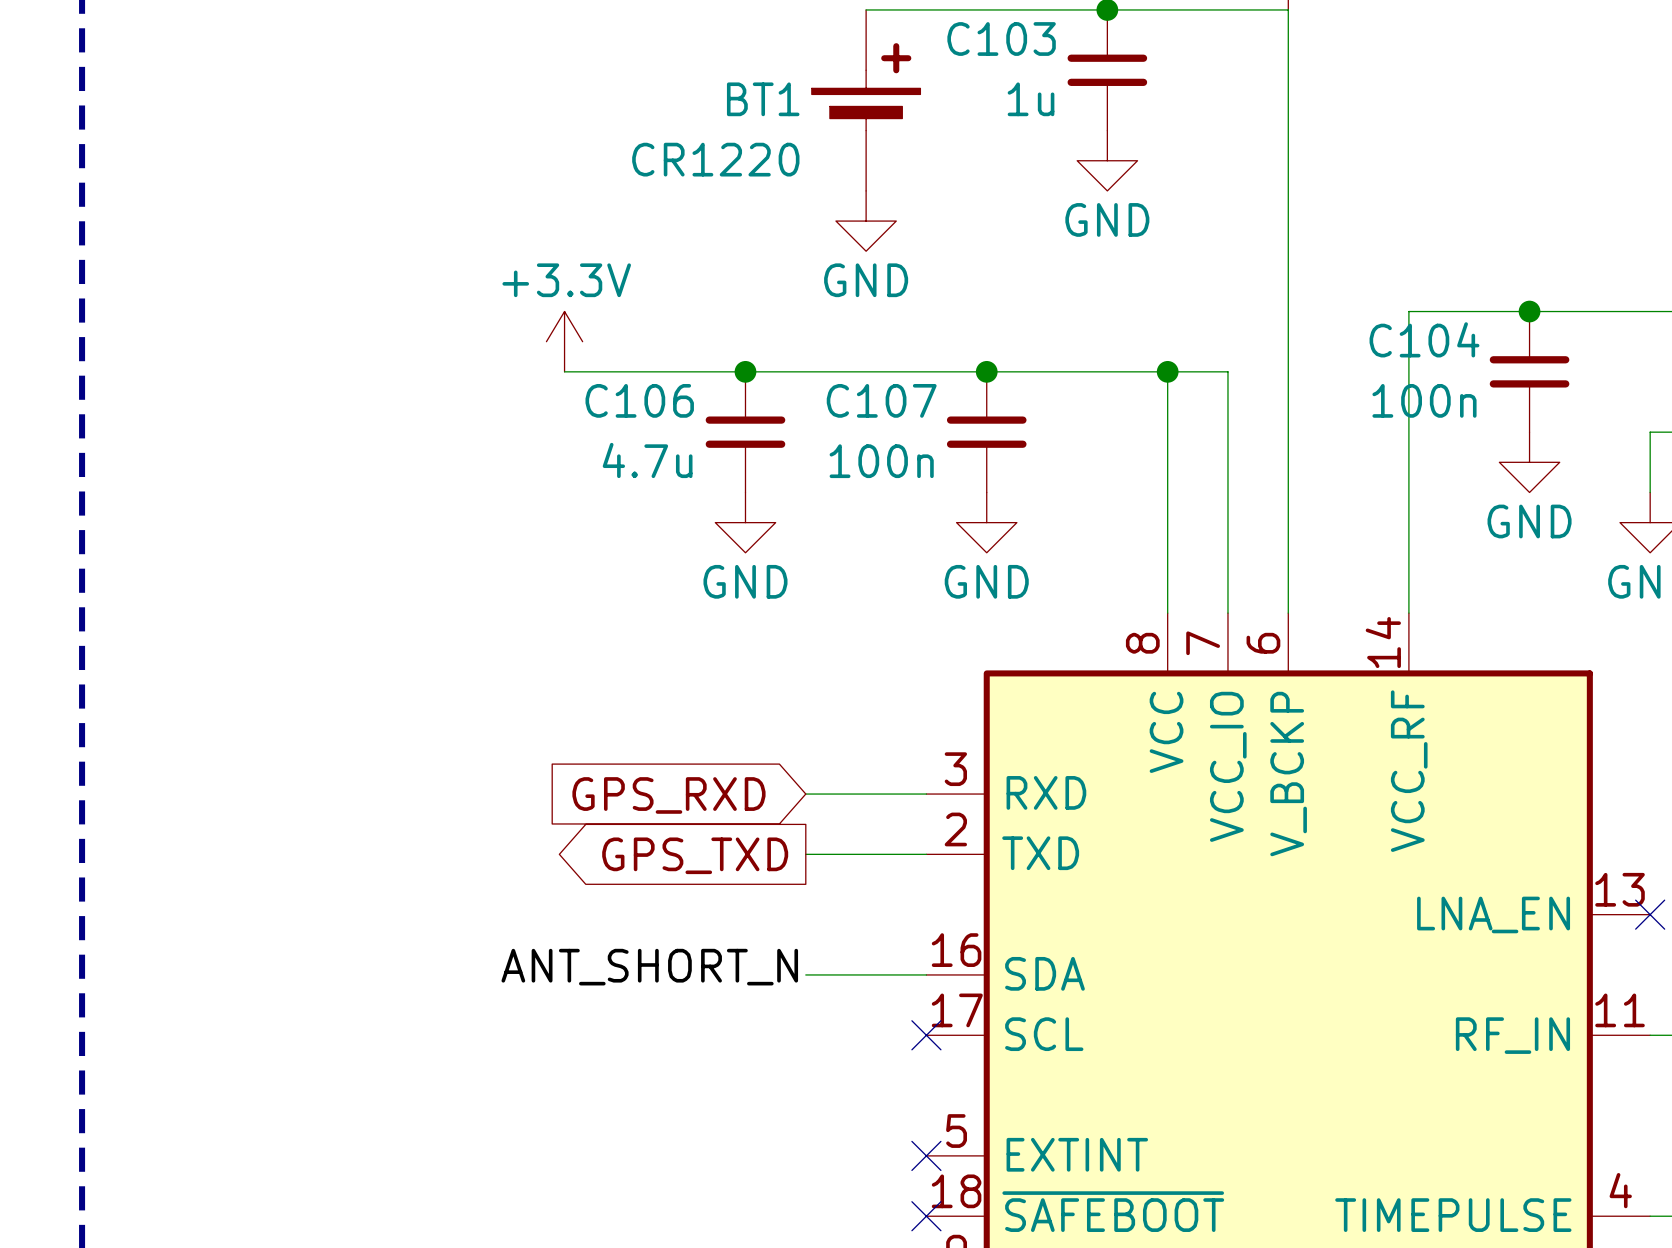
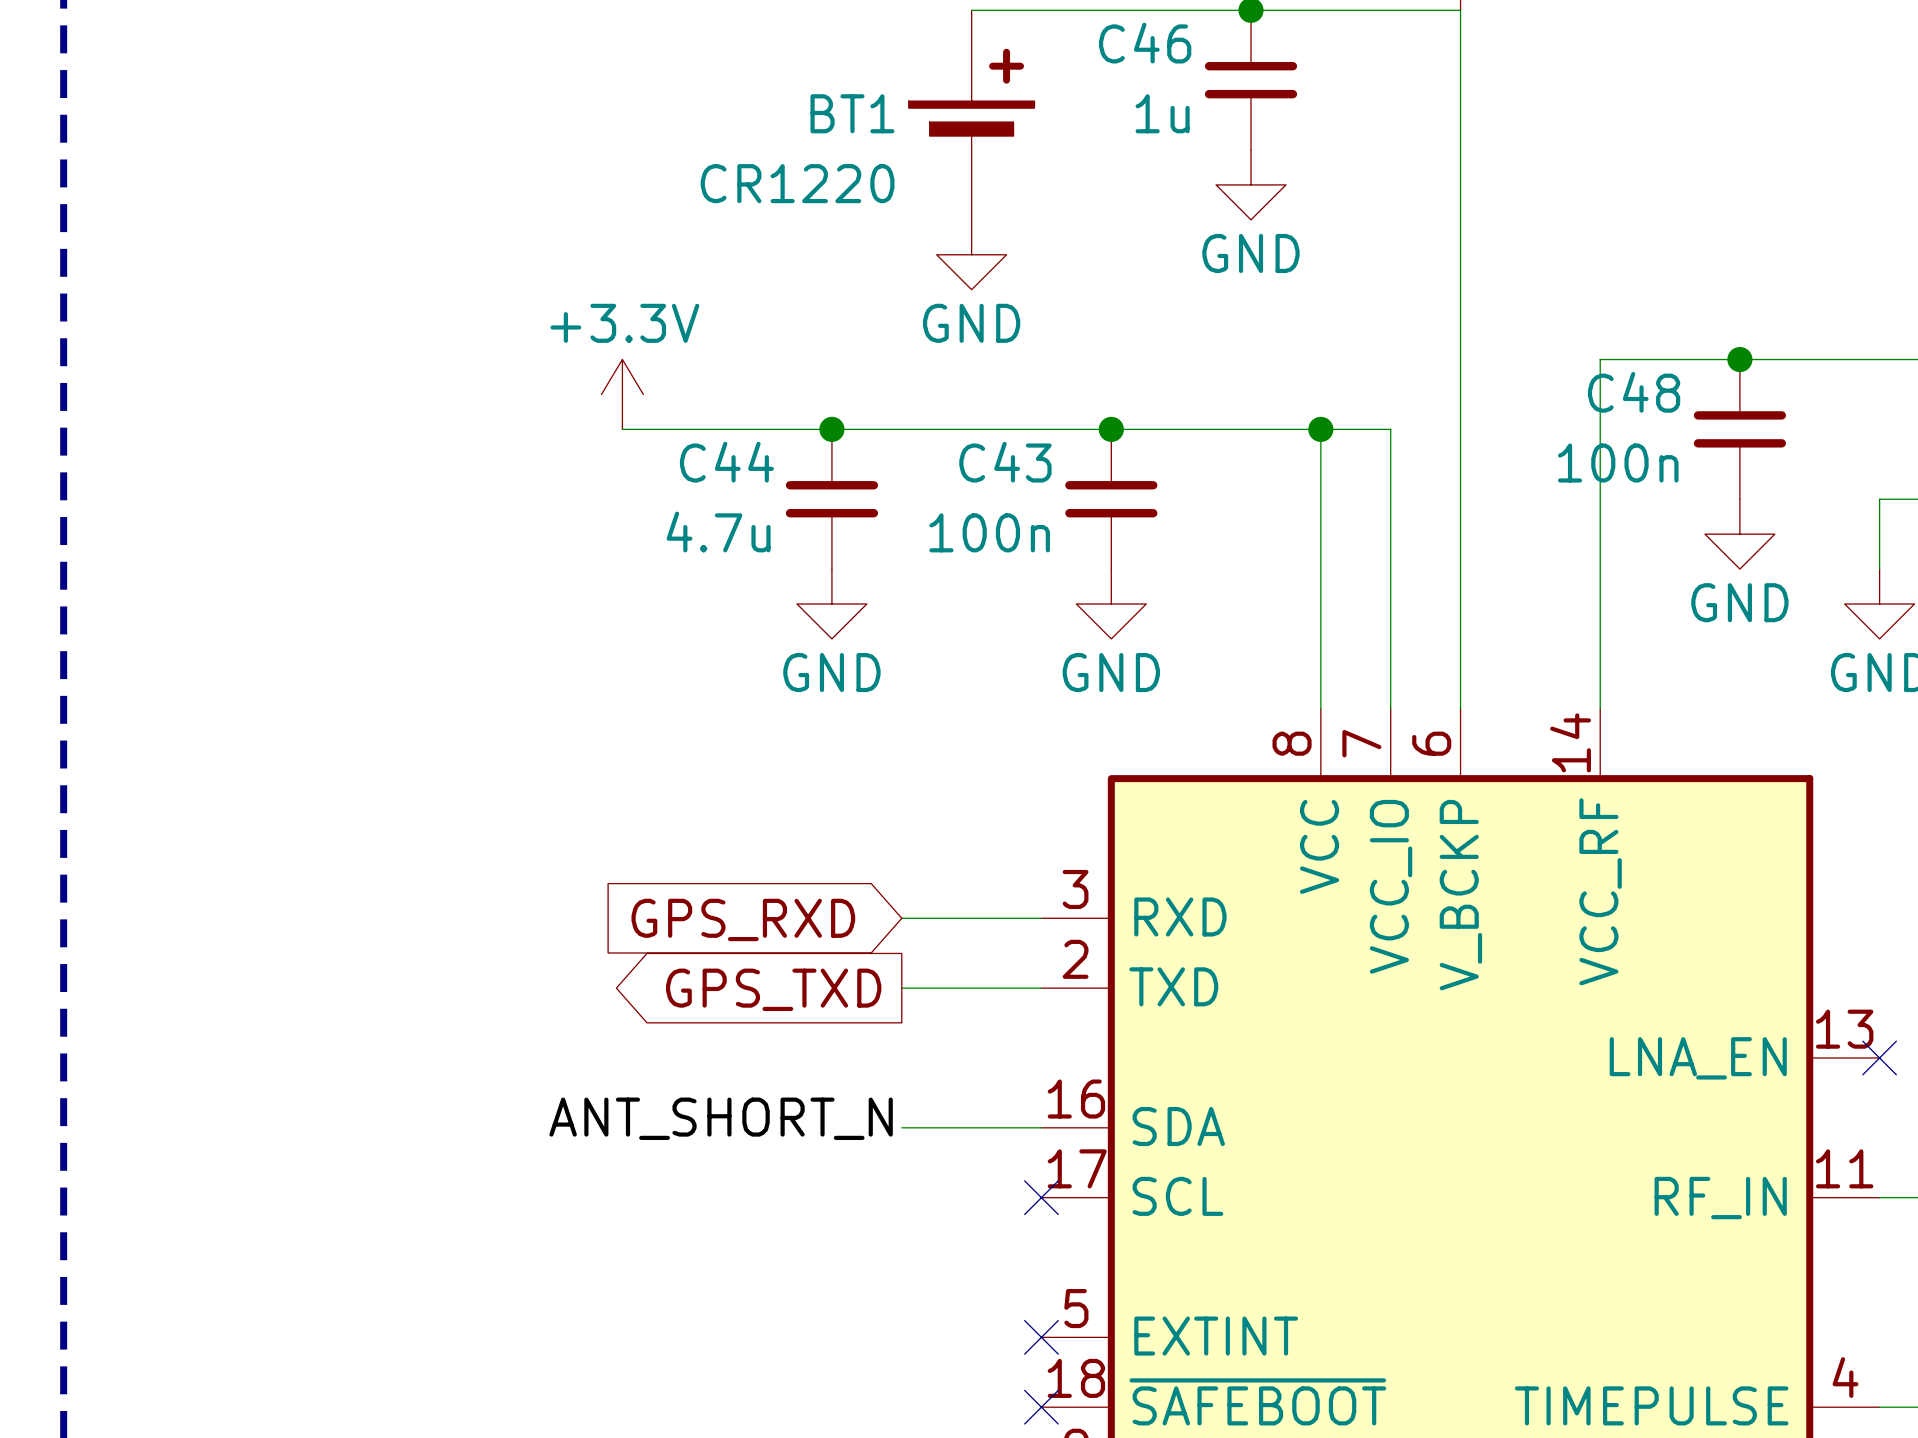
C103 name: C103 (1001, 39) -> C46 (1145, 43)
C104 name: C104 (1424, 339) -> C48 (1634, 392)
C106 name: C106 (639, 400) -> C44 (726, 462)
C107 name: C107 (881, 400) -> C43 (1005, 462)

